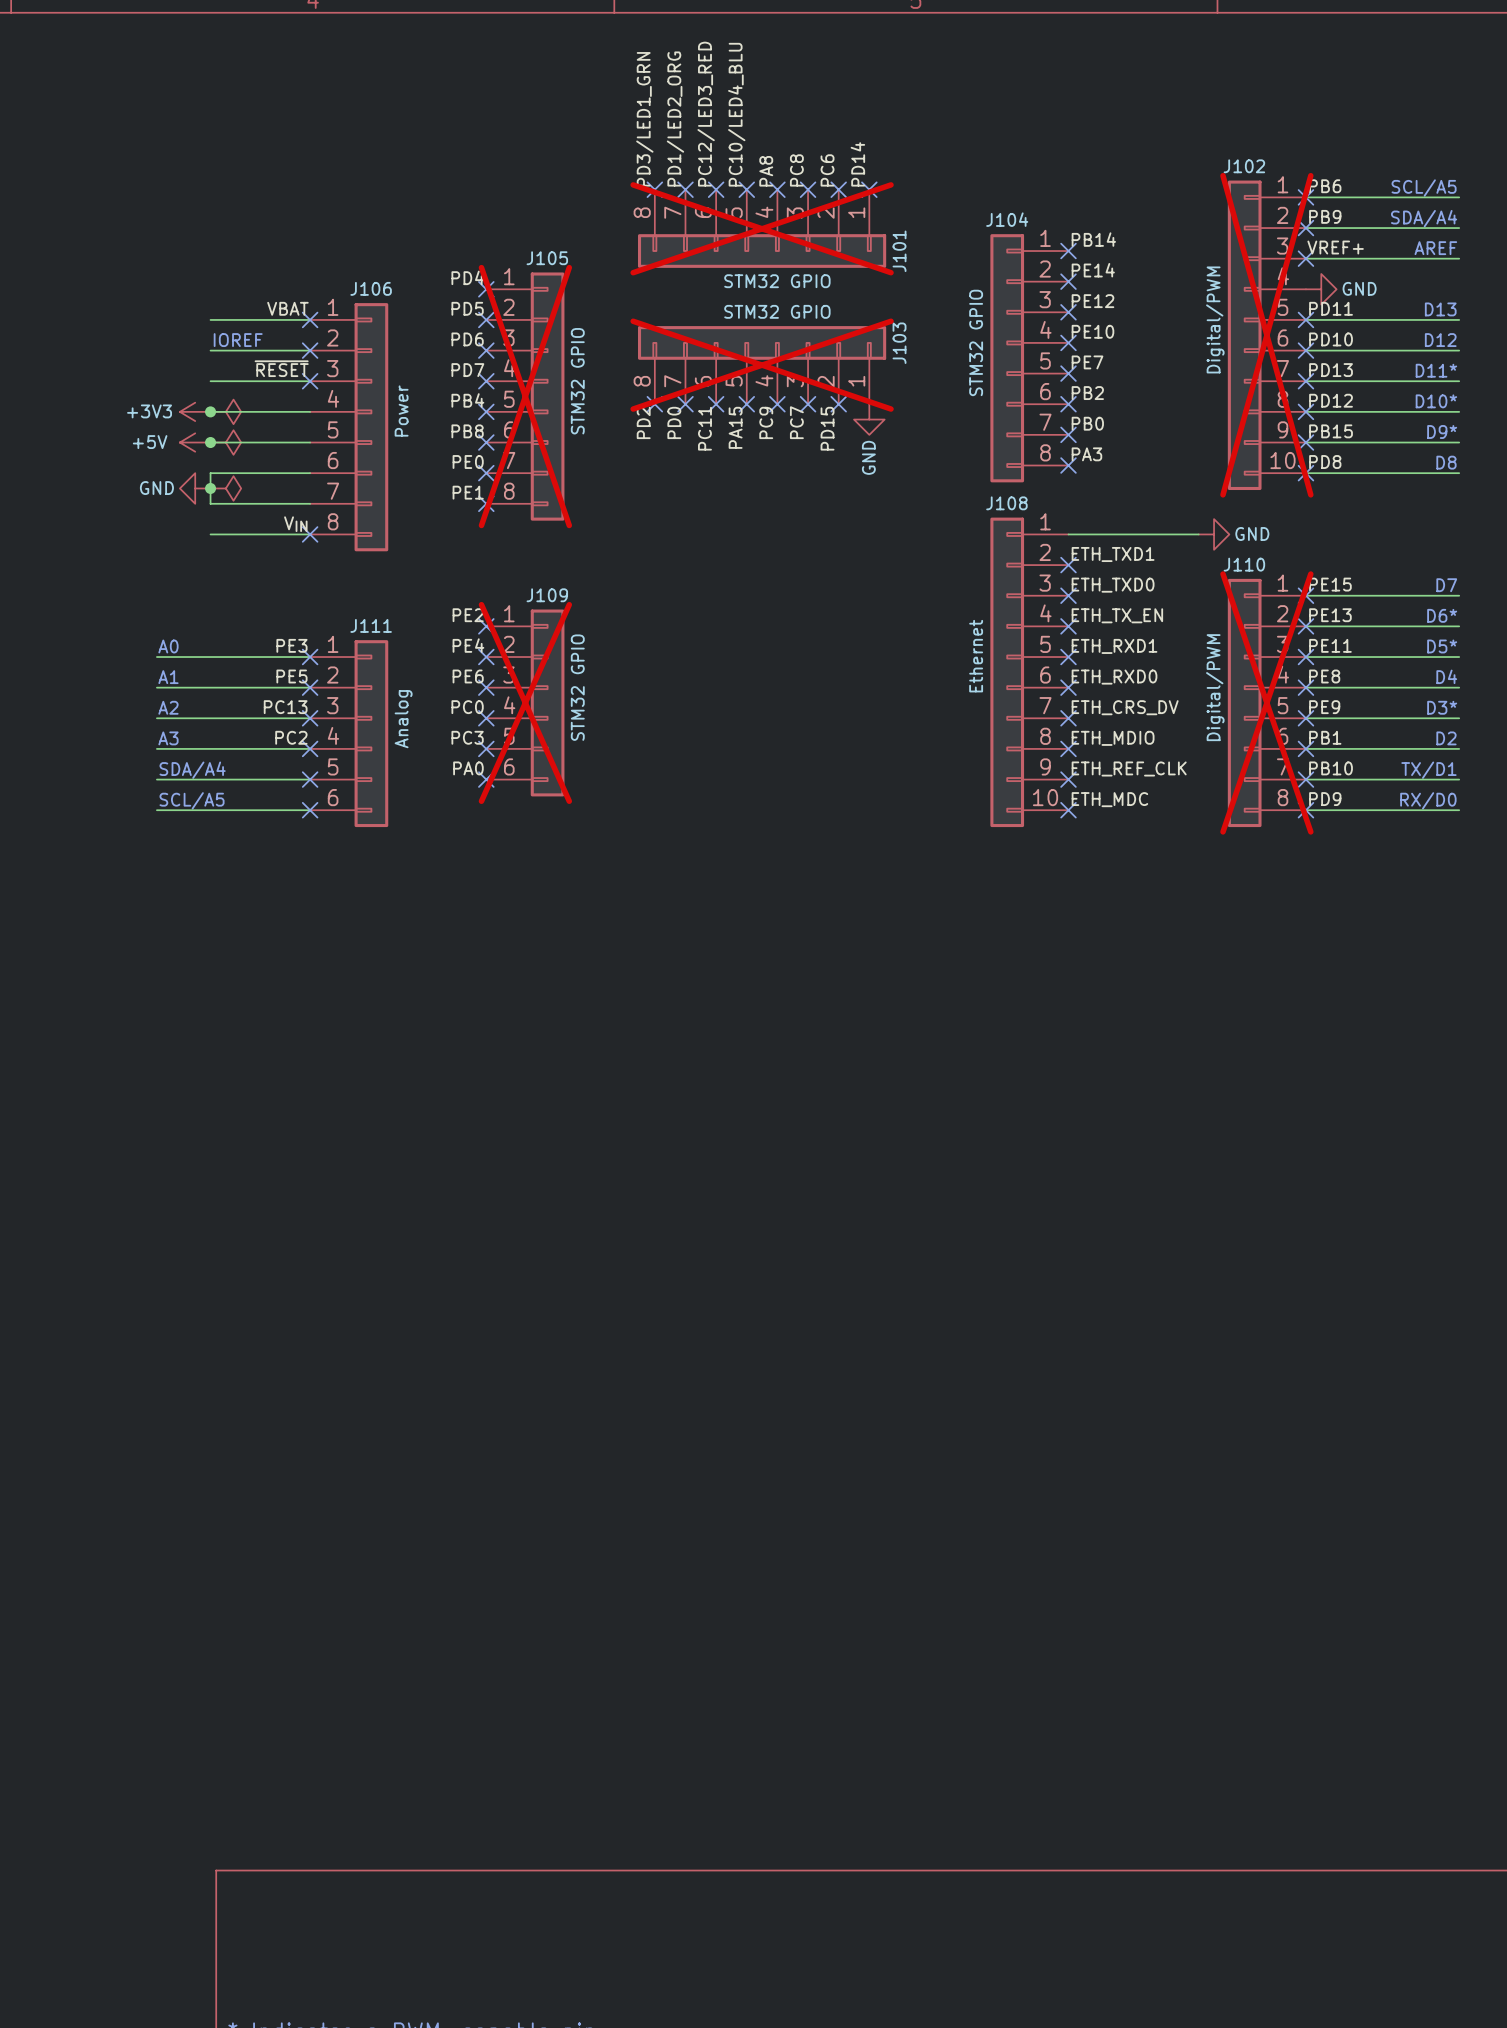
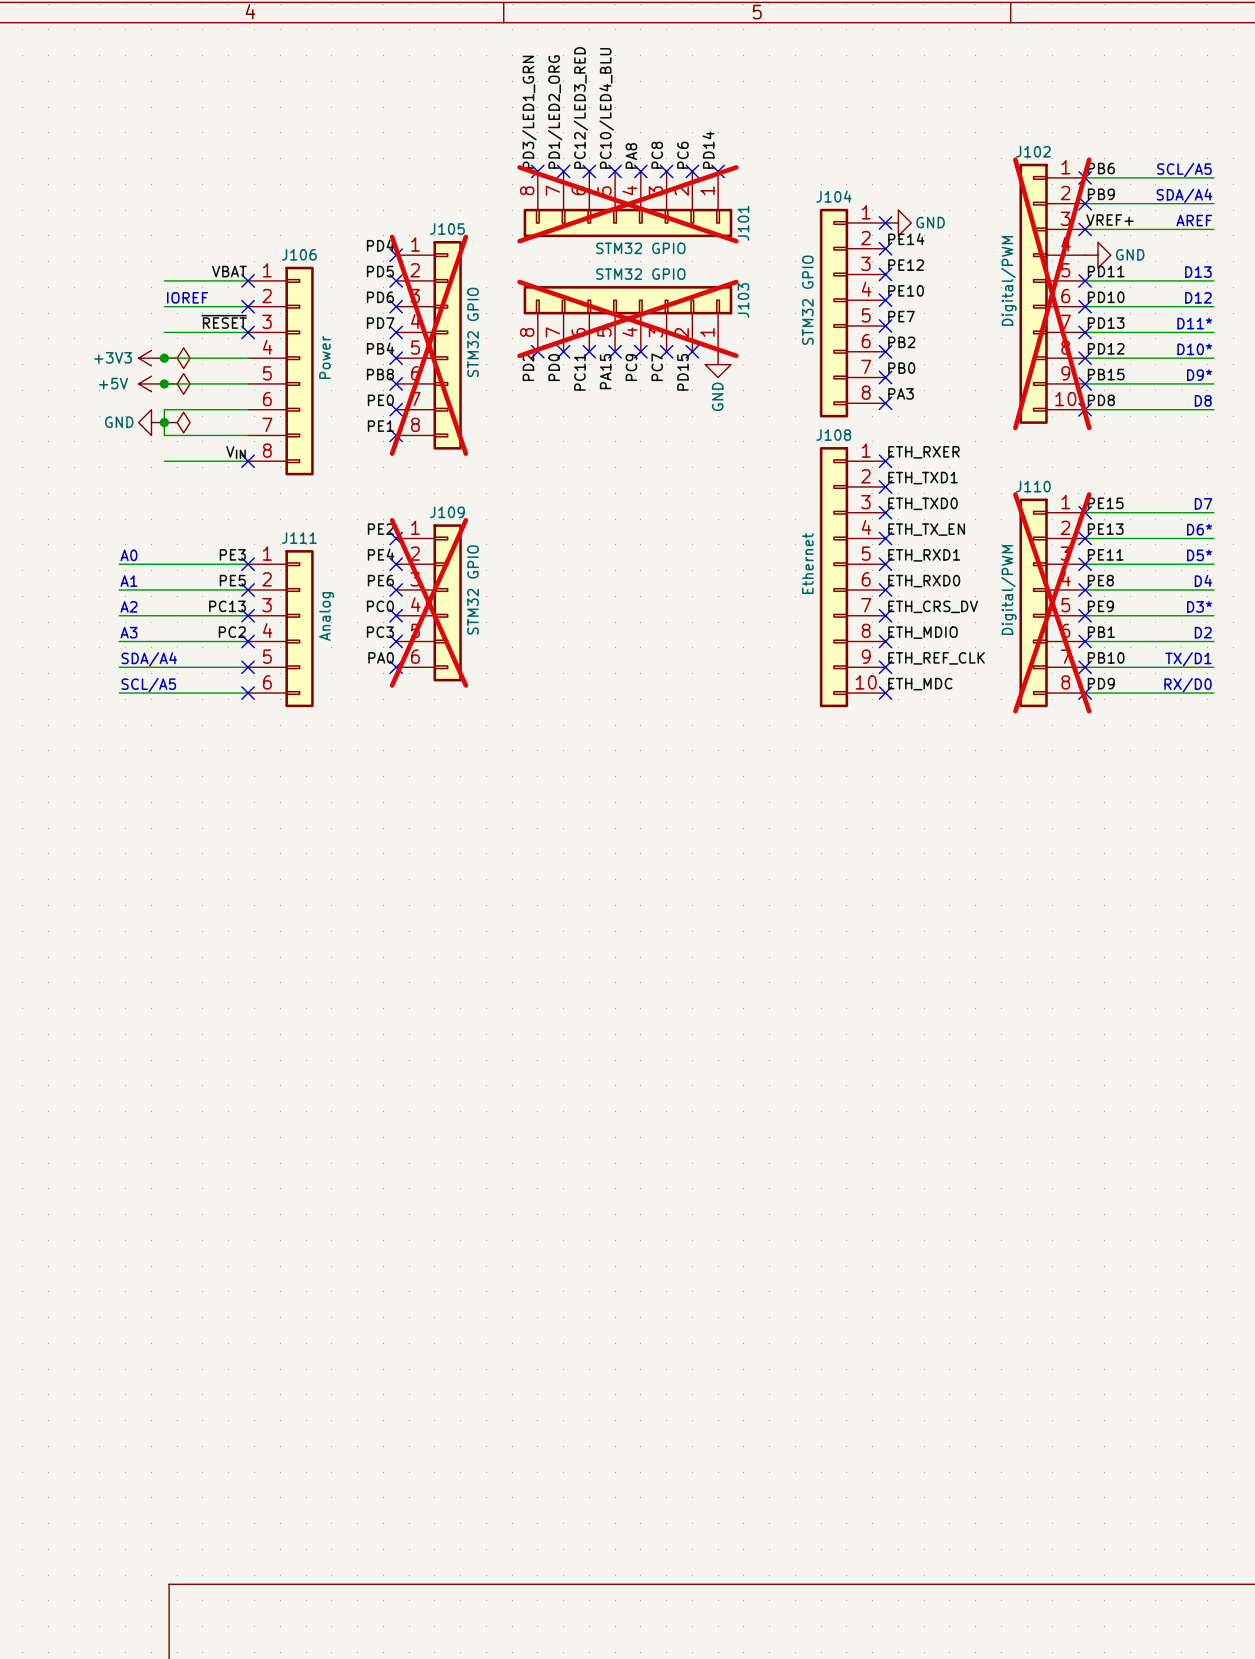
label: PB14 (1093, 239) -> none
power symbol: none -> GND (898, 222)
label: none -> ETH_RXER (923, 452)
wire: (1068, 534) (1198, 534) -> none
no-connect mark: none -> (885, 461)
power symbol: GND (1214, 534) -> none

